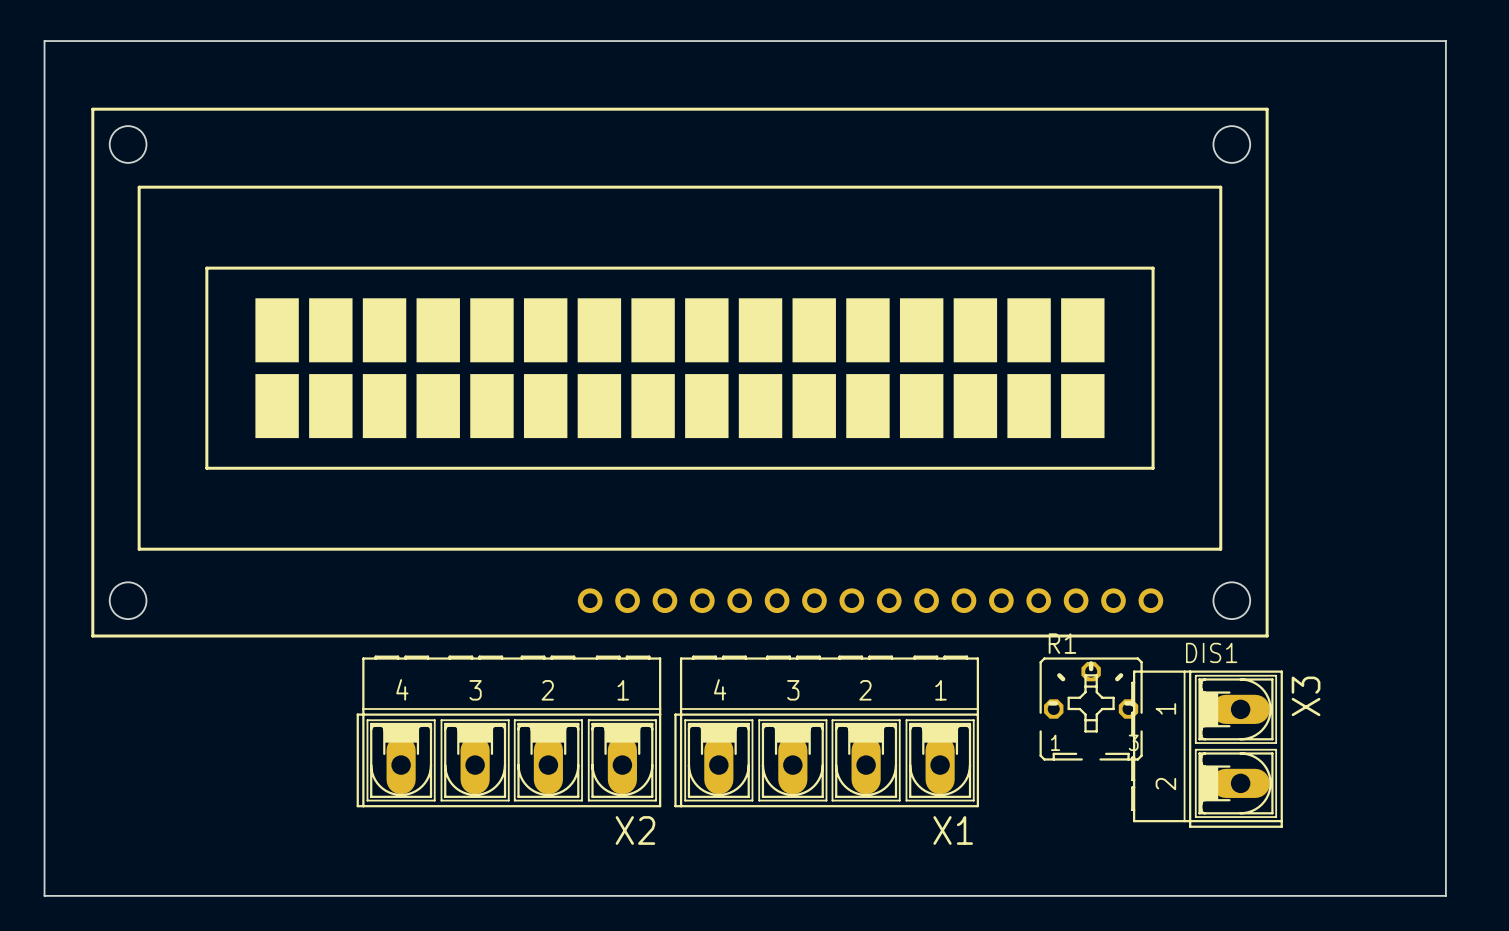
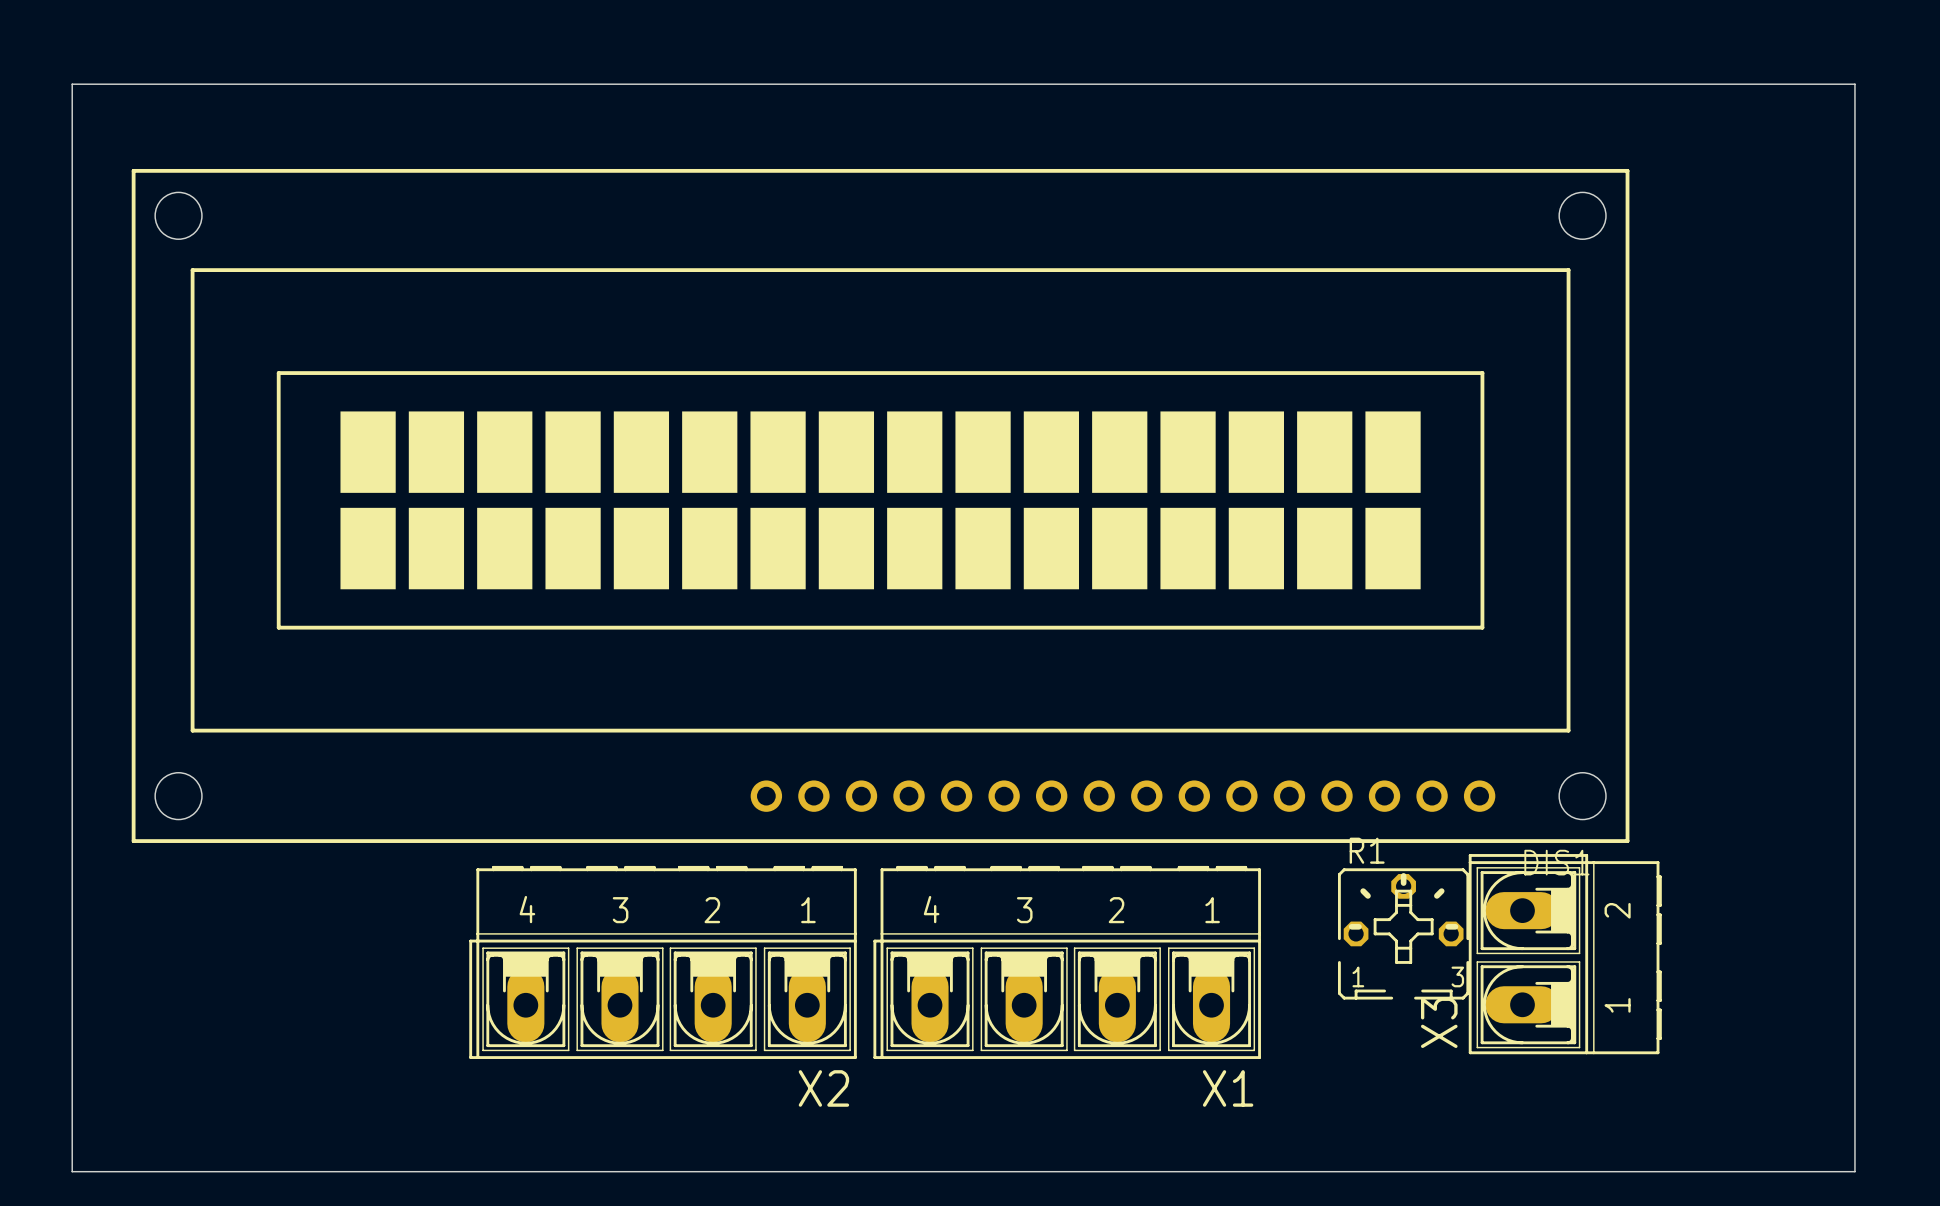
X3 footprint: [1131, 670, 1283, 828] -> [1468, 854, 1662, 1055]
X3 name position: X3 (1306, 696) -> X3 (1439, 1022)

